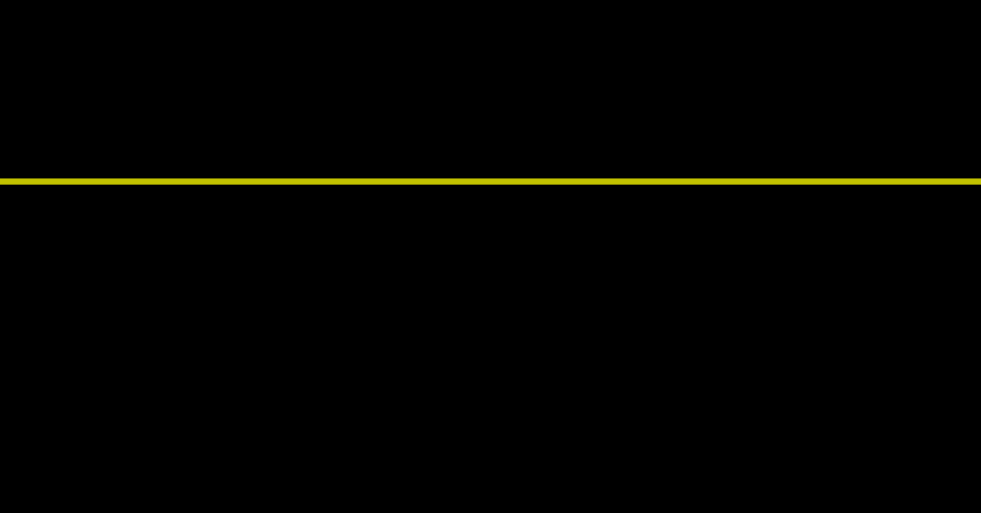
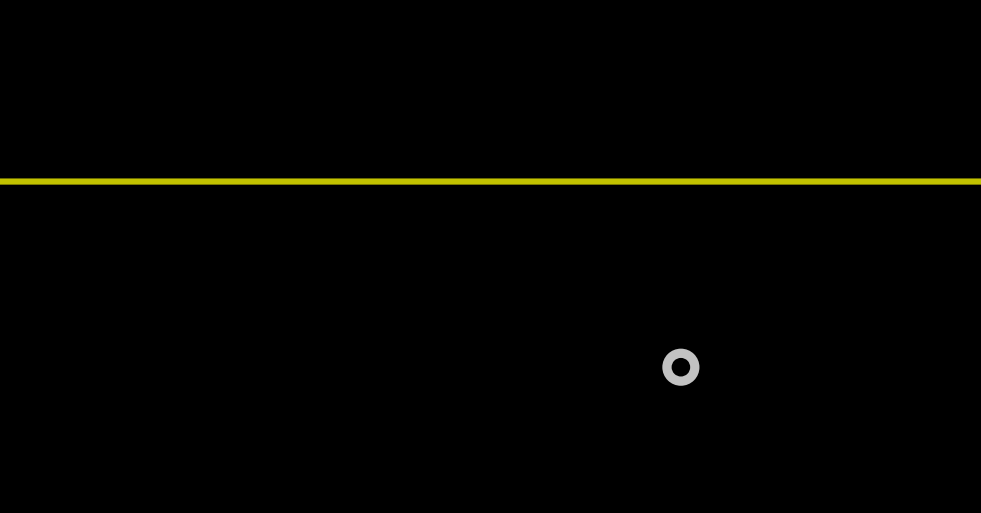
via: none -> (680, 367)

